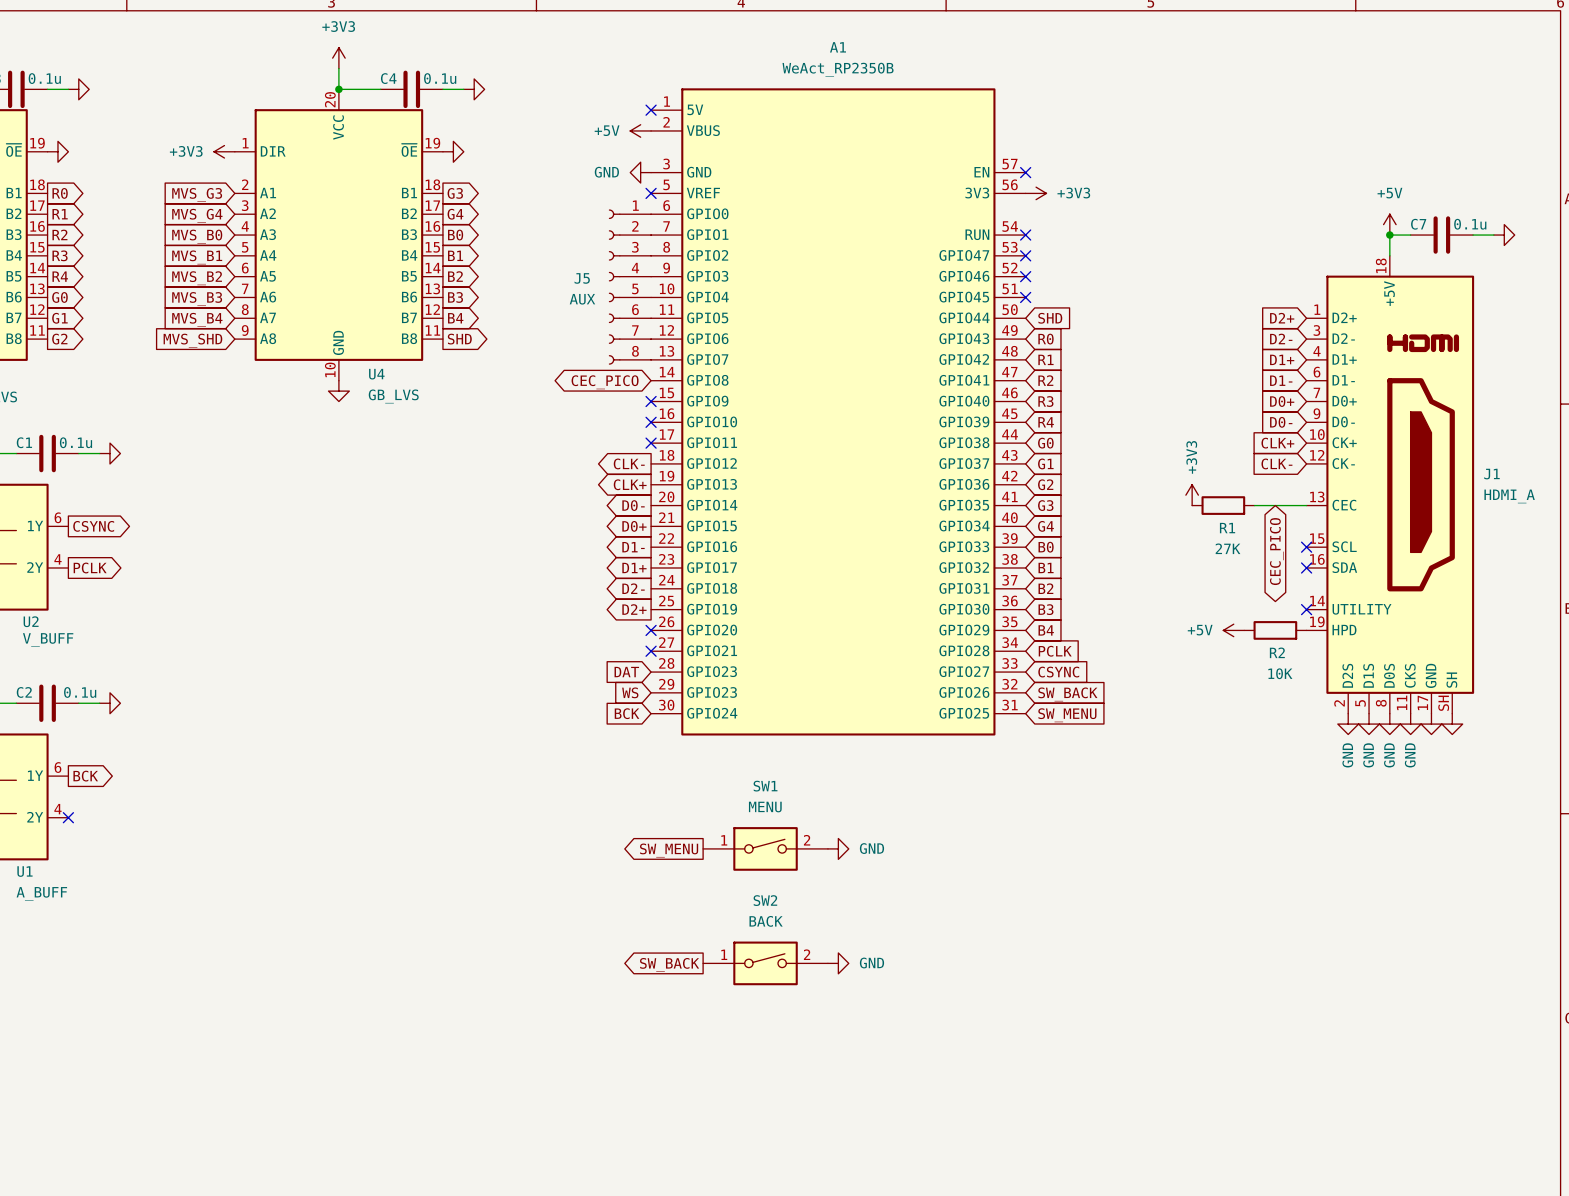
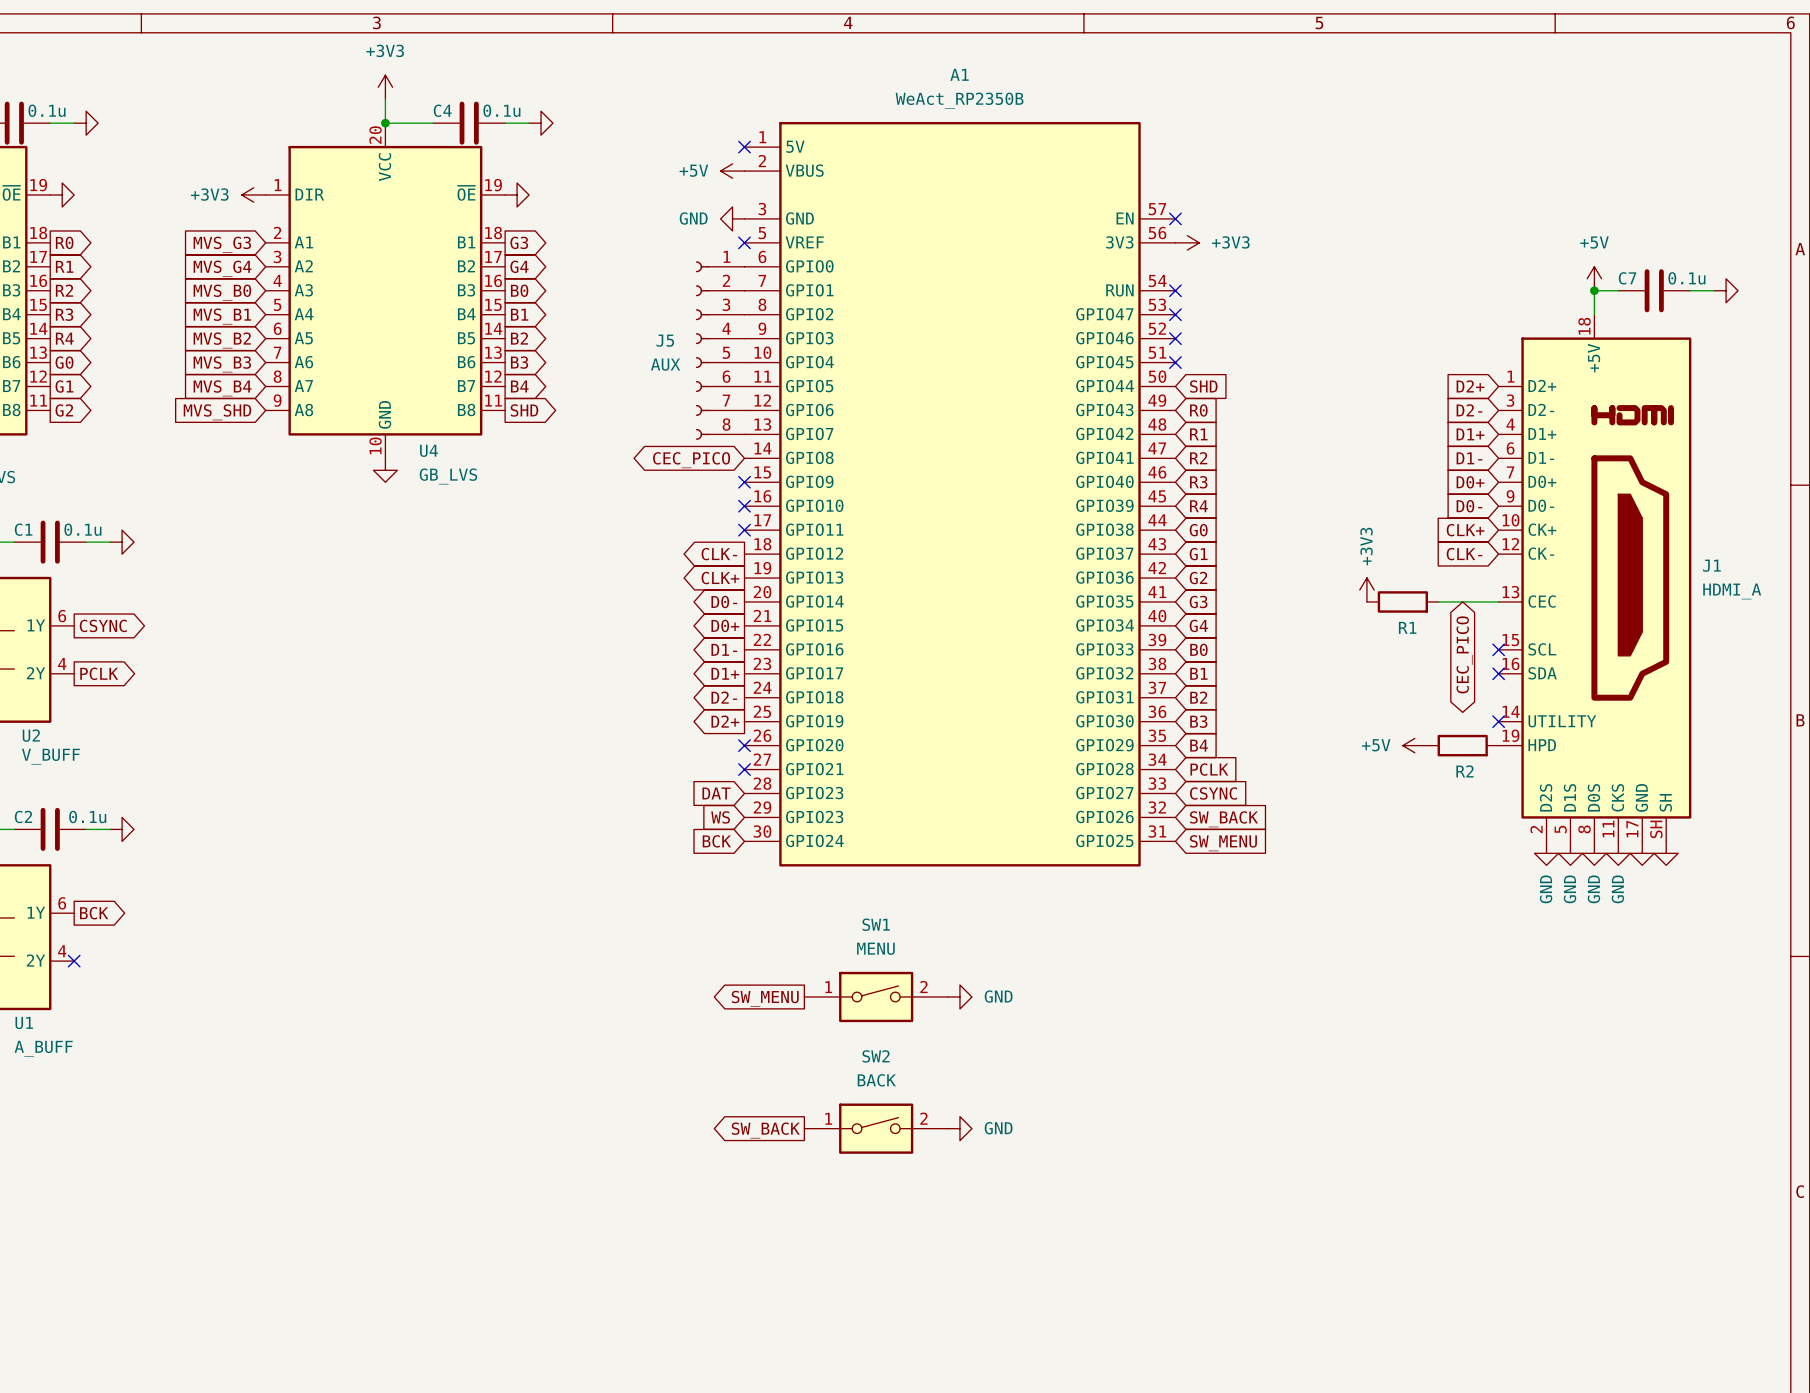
R1 value: 27K (1228, 548) -> none
R2 value: 10K (1280, 673) -> none

